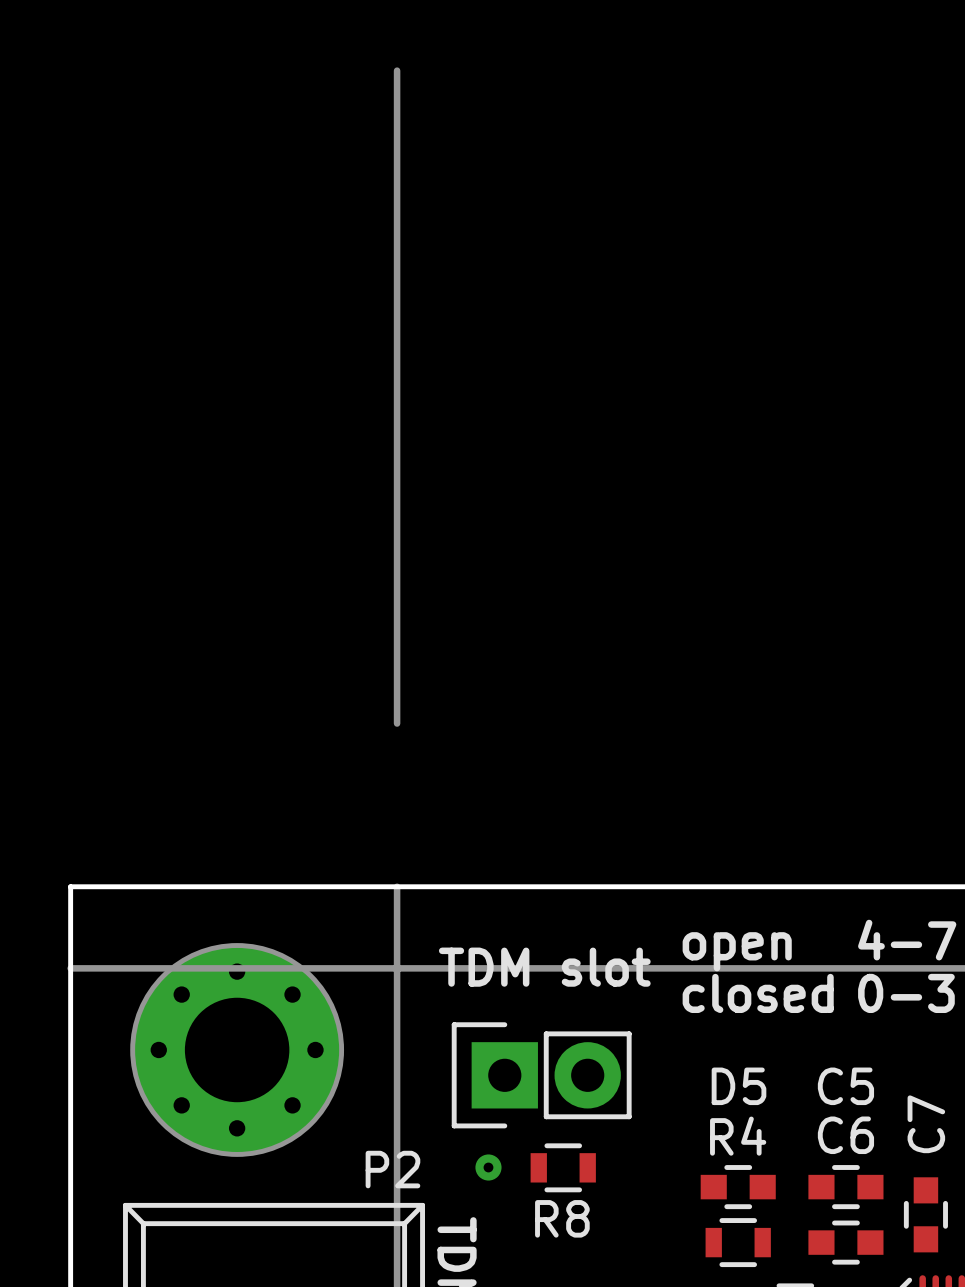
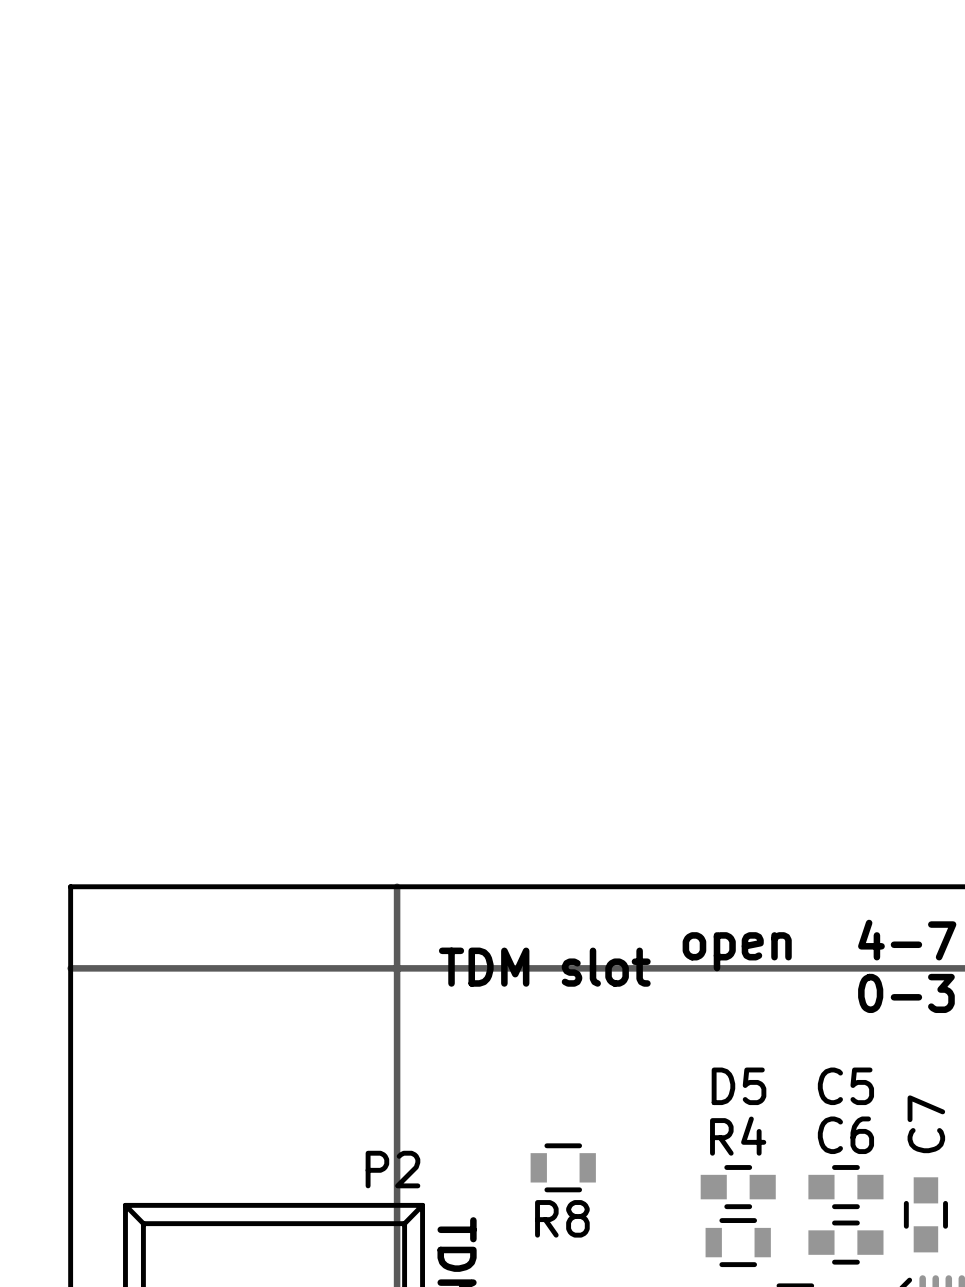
line: (397, 70) (397, 723) -> none
text: closed (758, 993) -> none
part: (237, 1049) -> none
part: (541, 1075) -> none
part: (488, 1167) -> none

